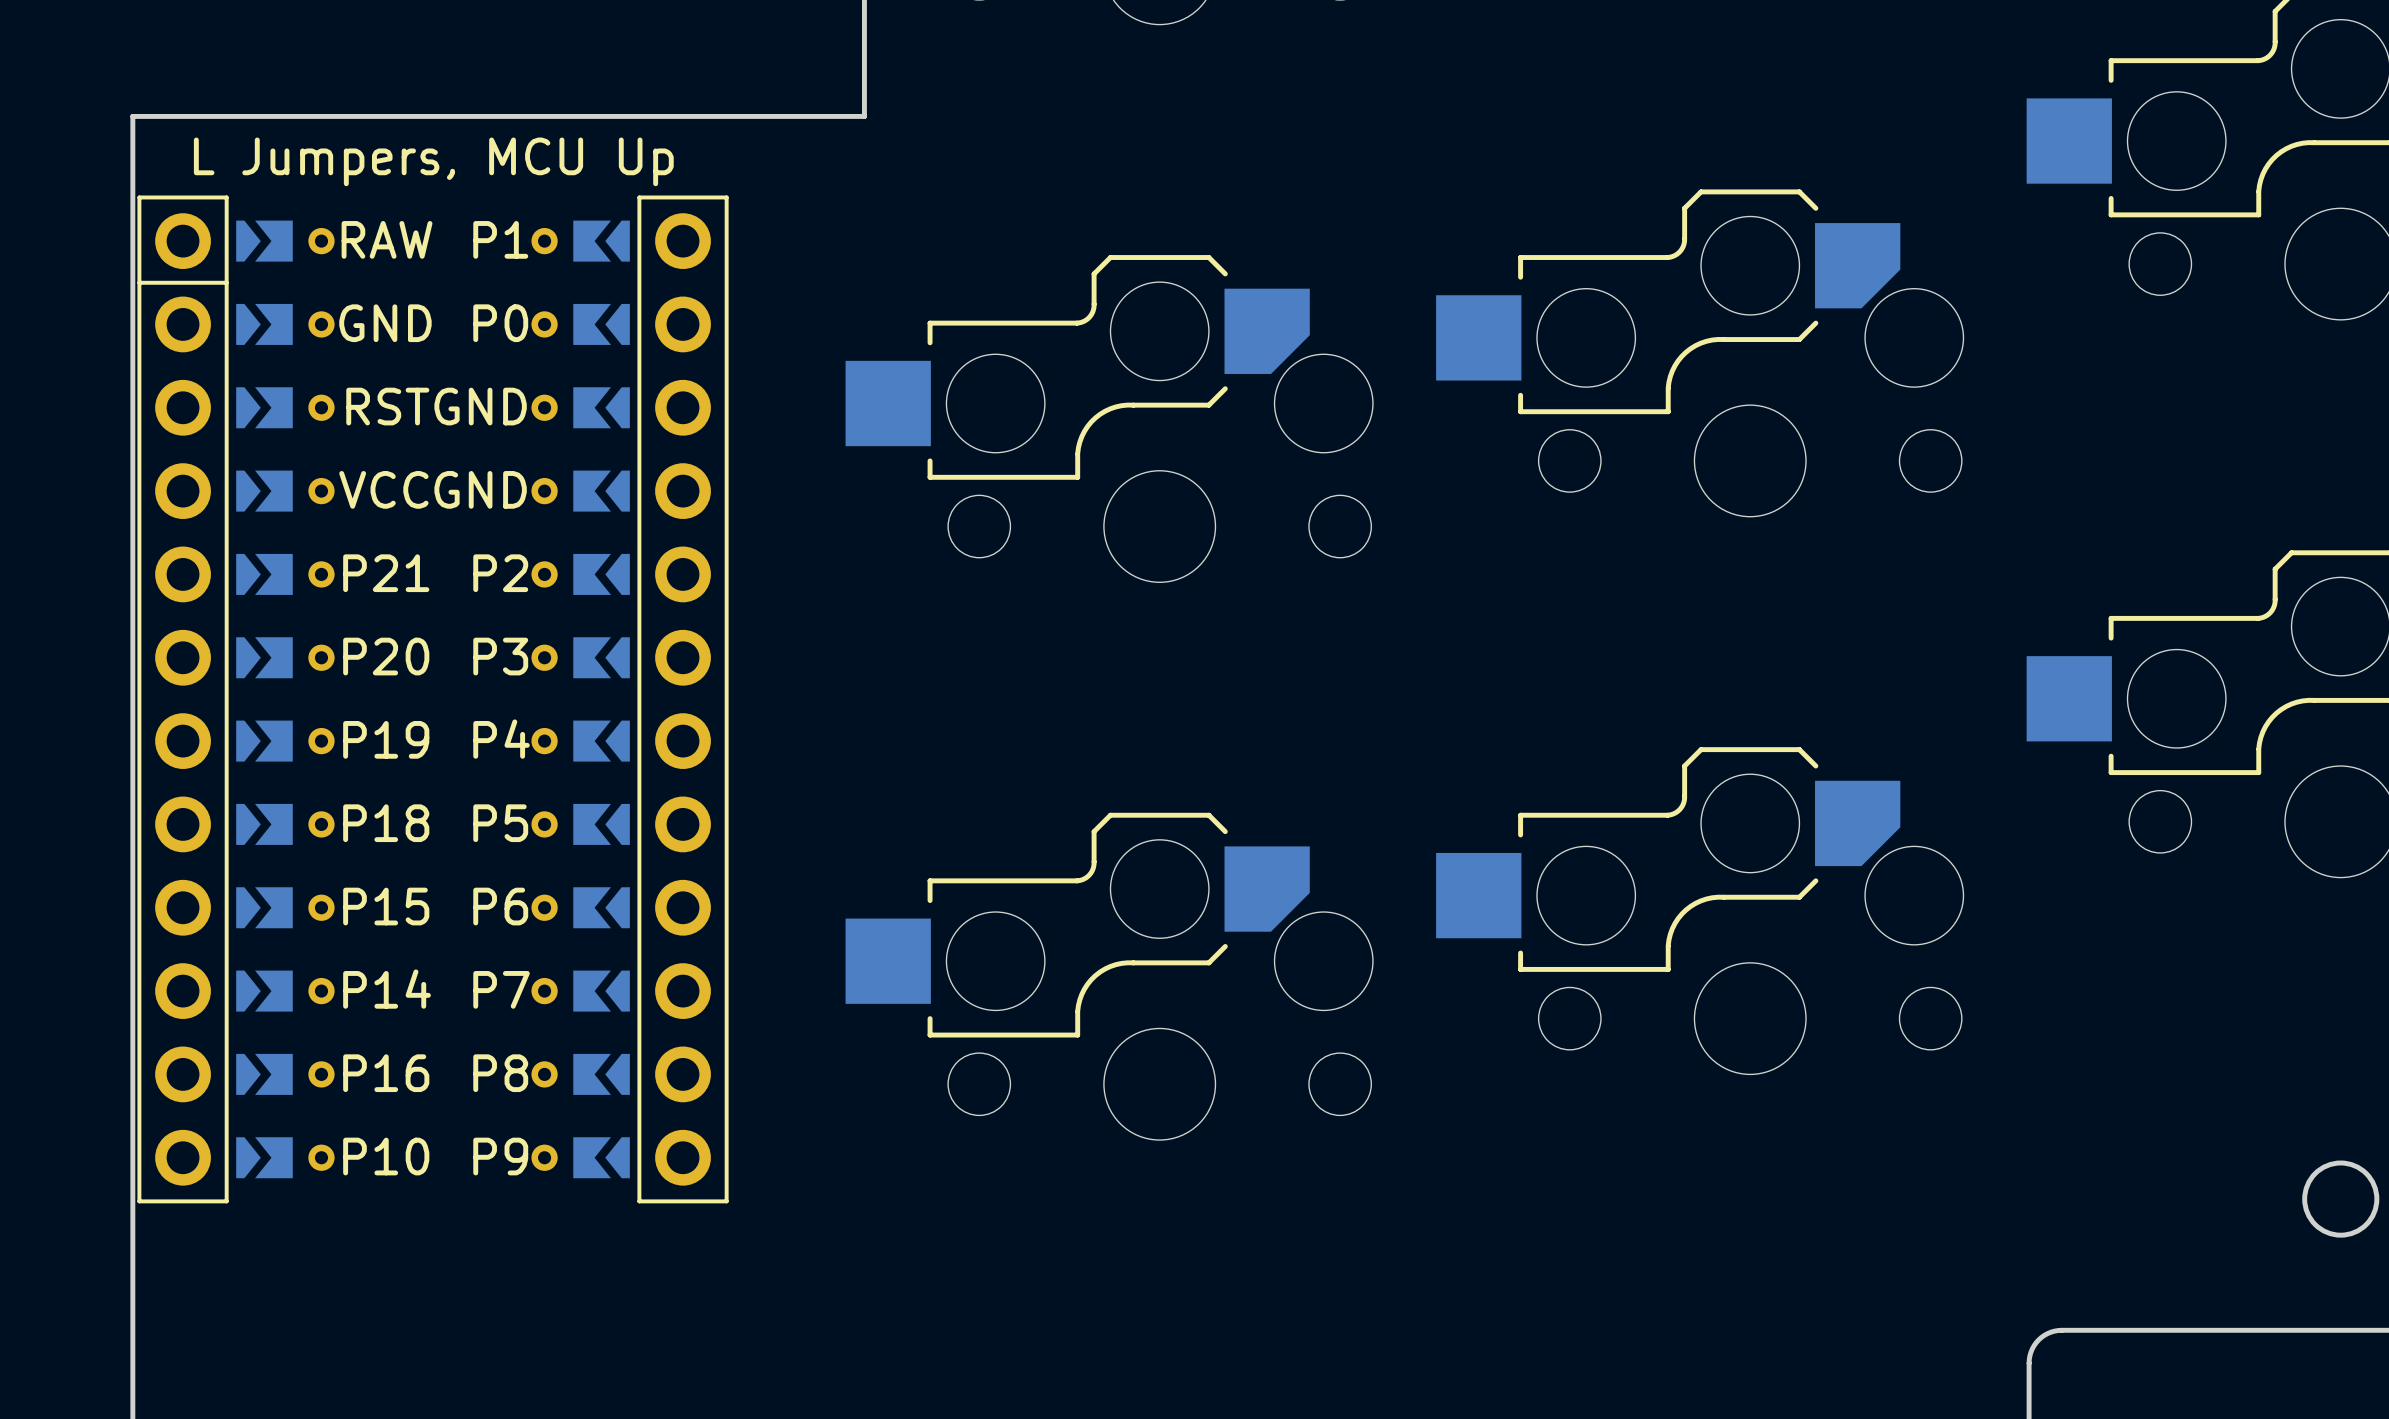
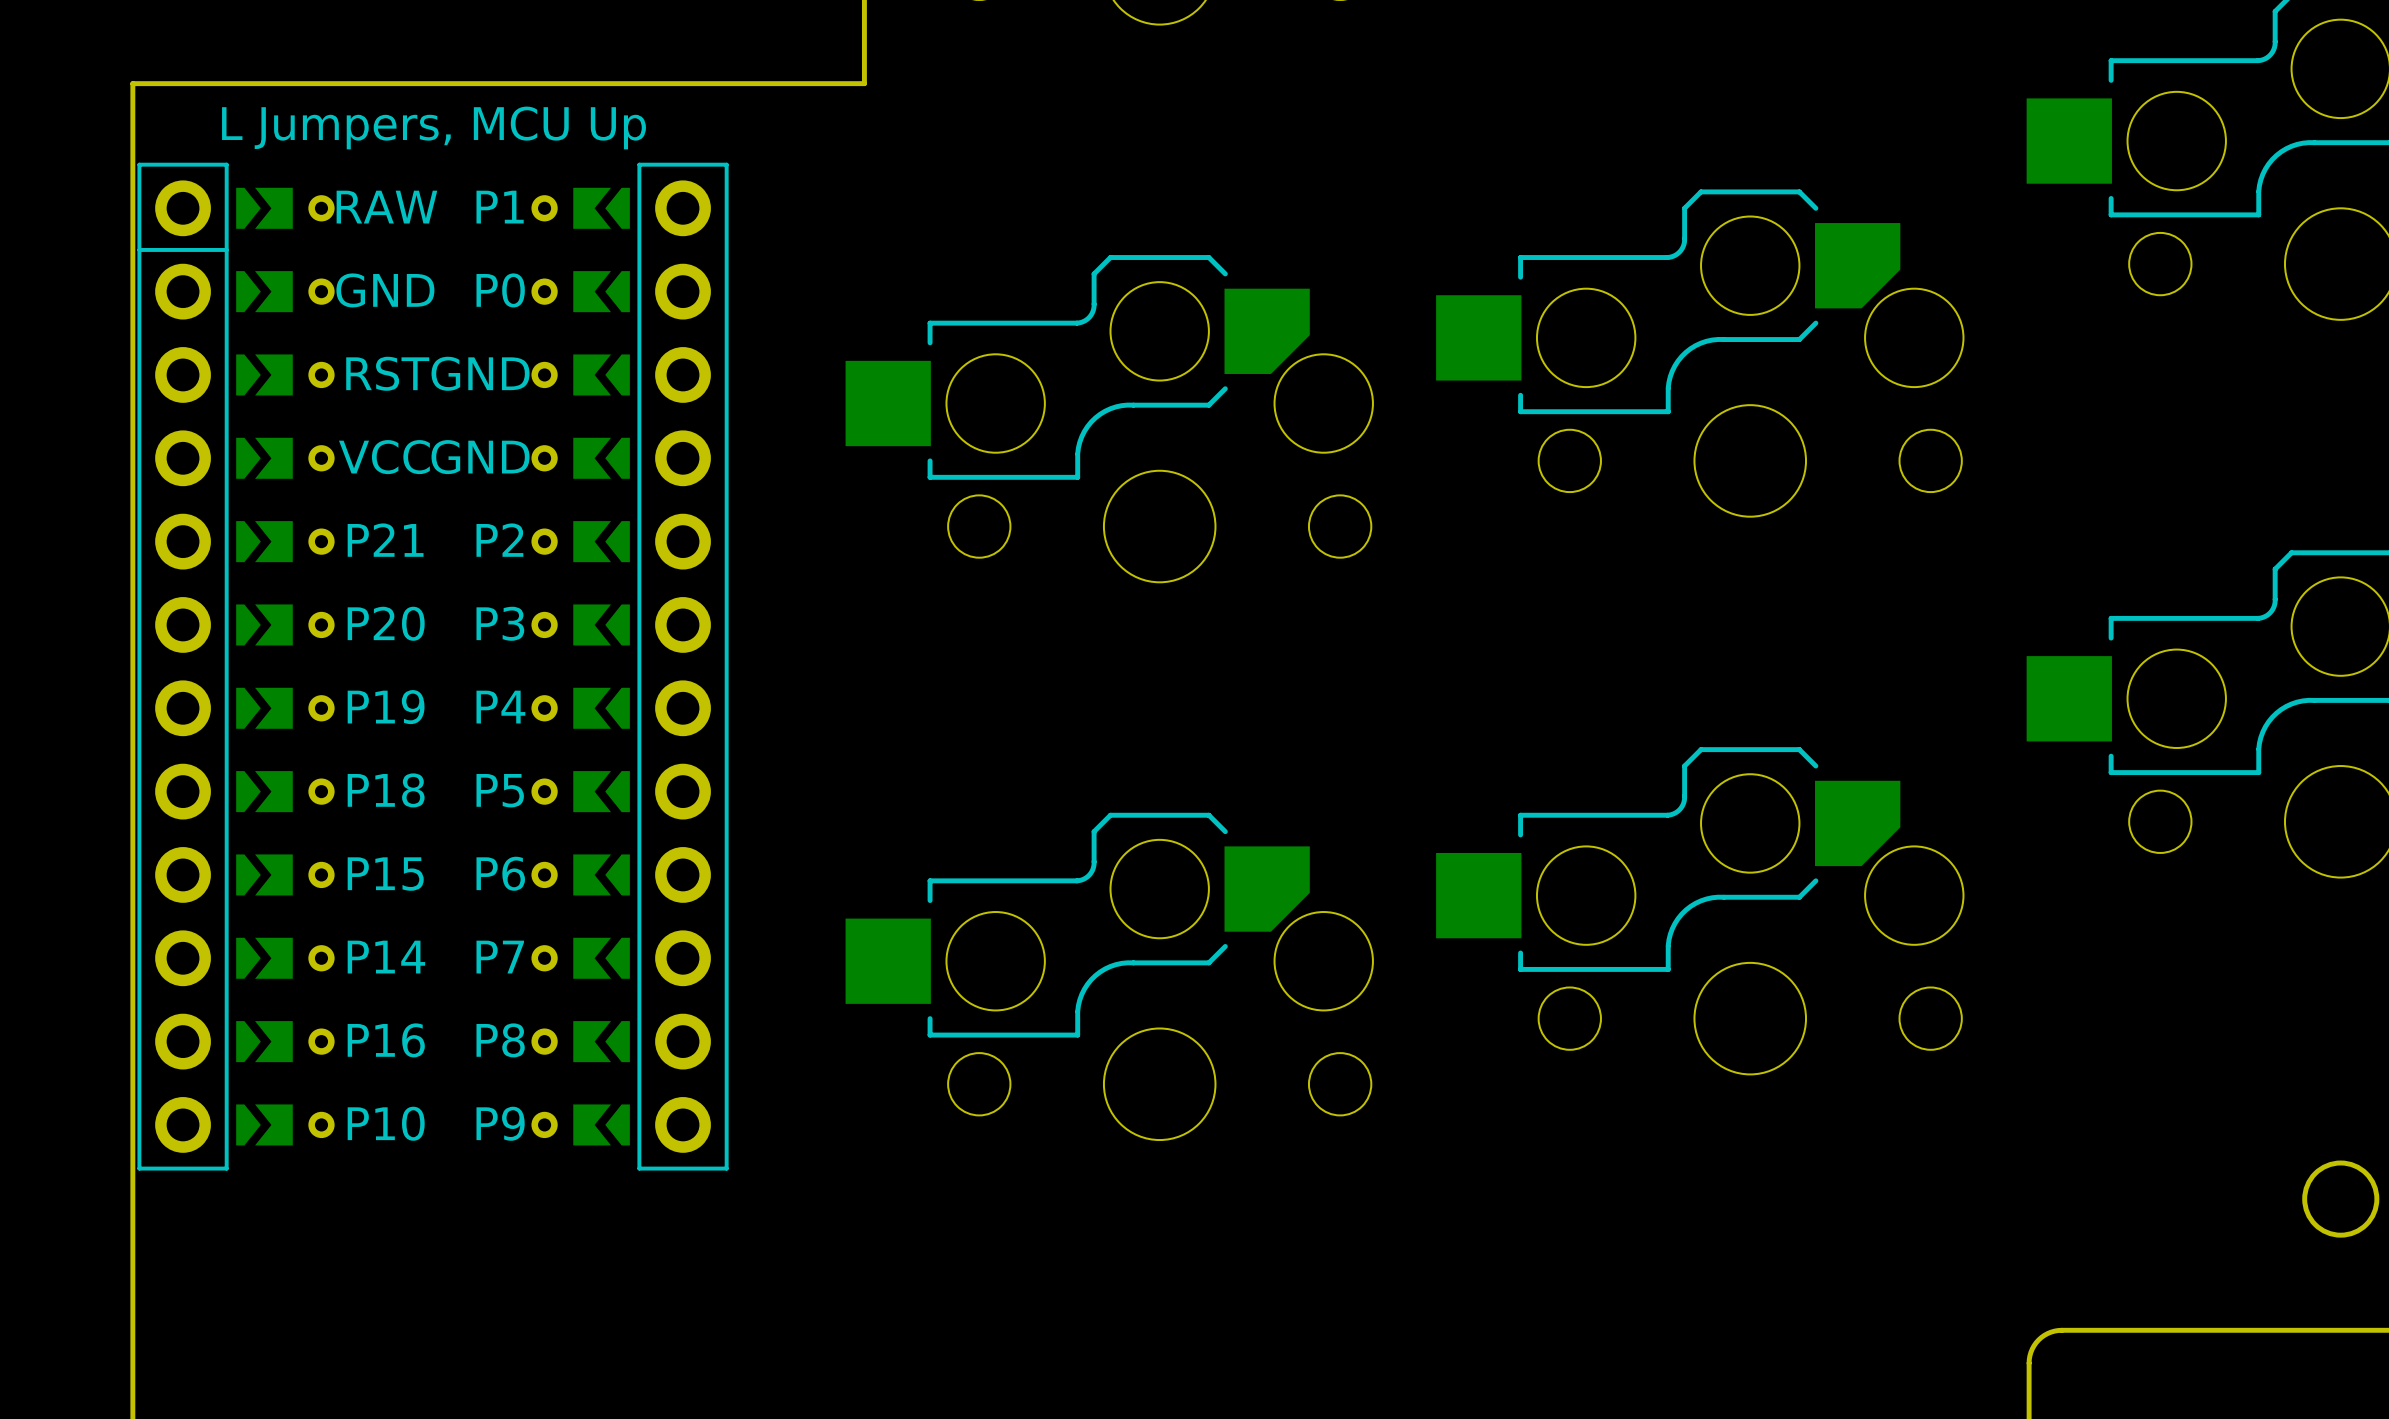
board edge: (864, 83) (864, 116) (132, 116) -> (864, 83) (132, 83) (132, 116)
part position: (433, 699) -> (433, 666)

